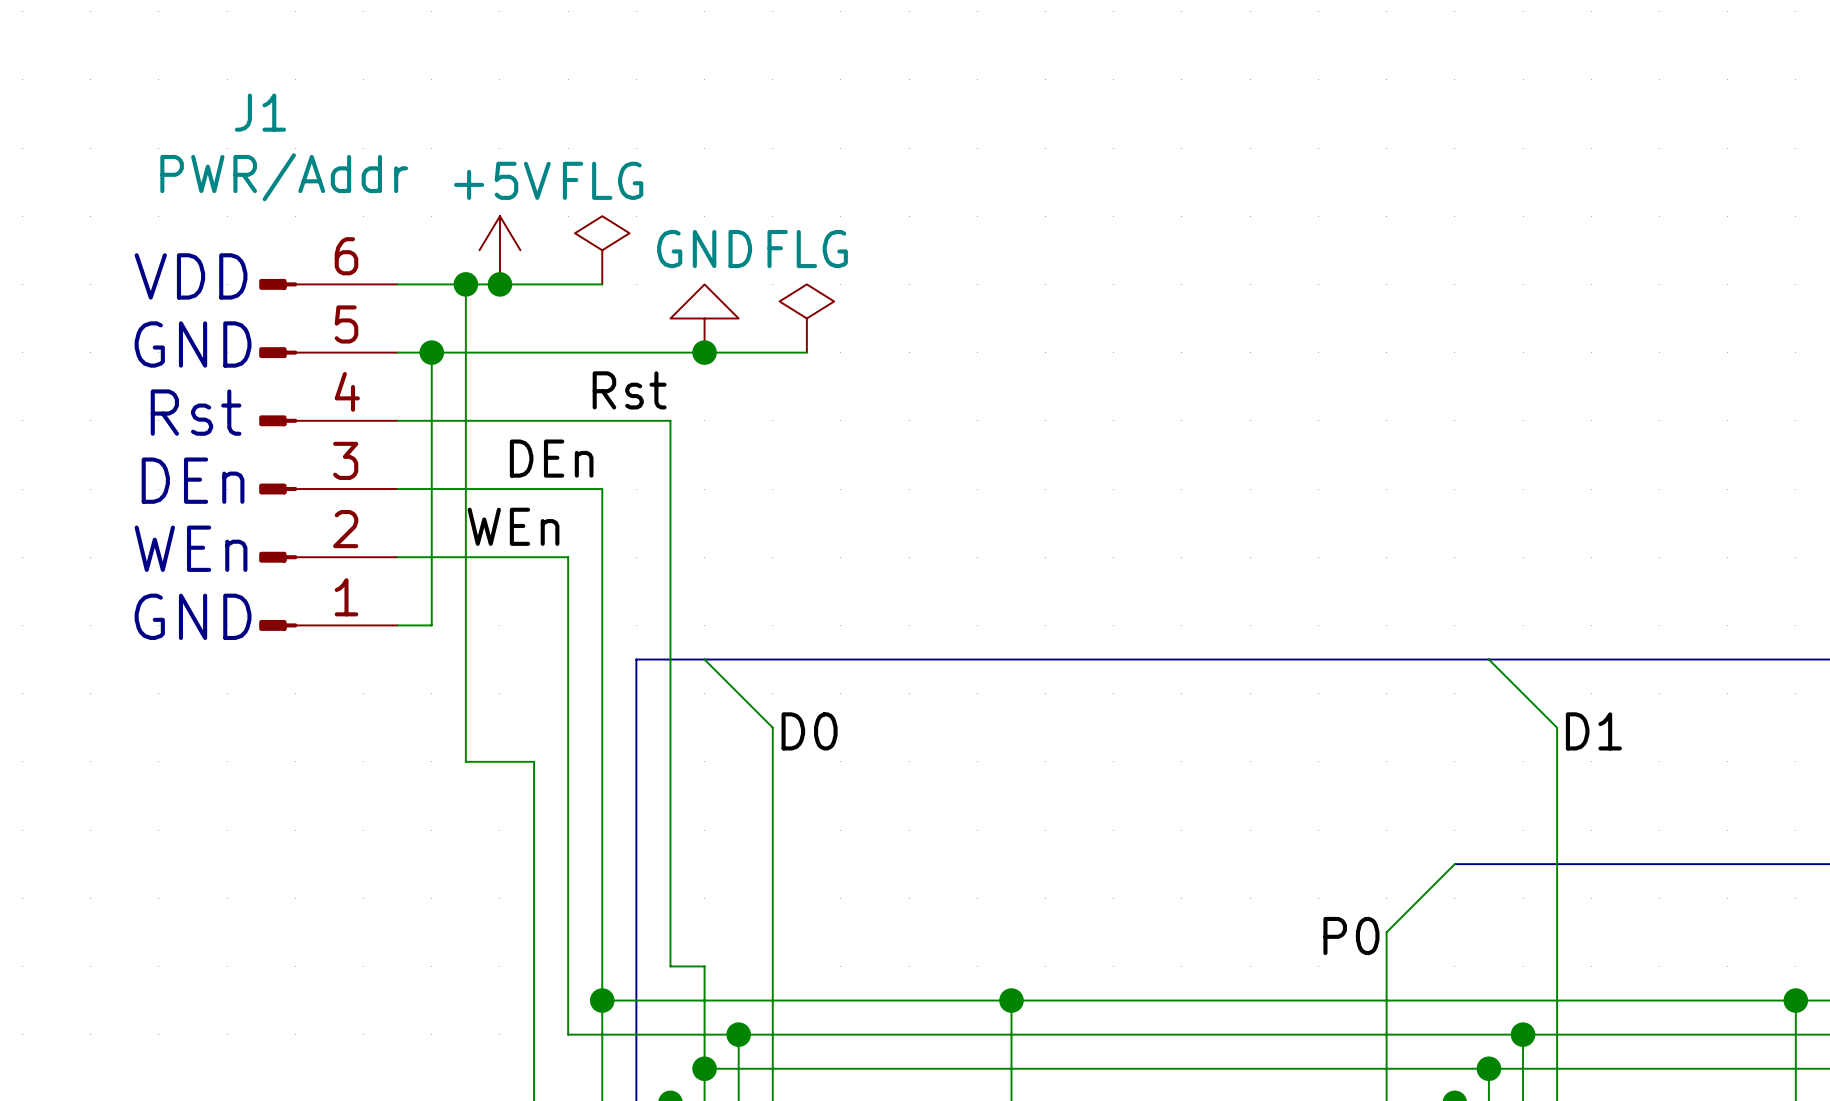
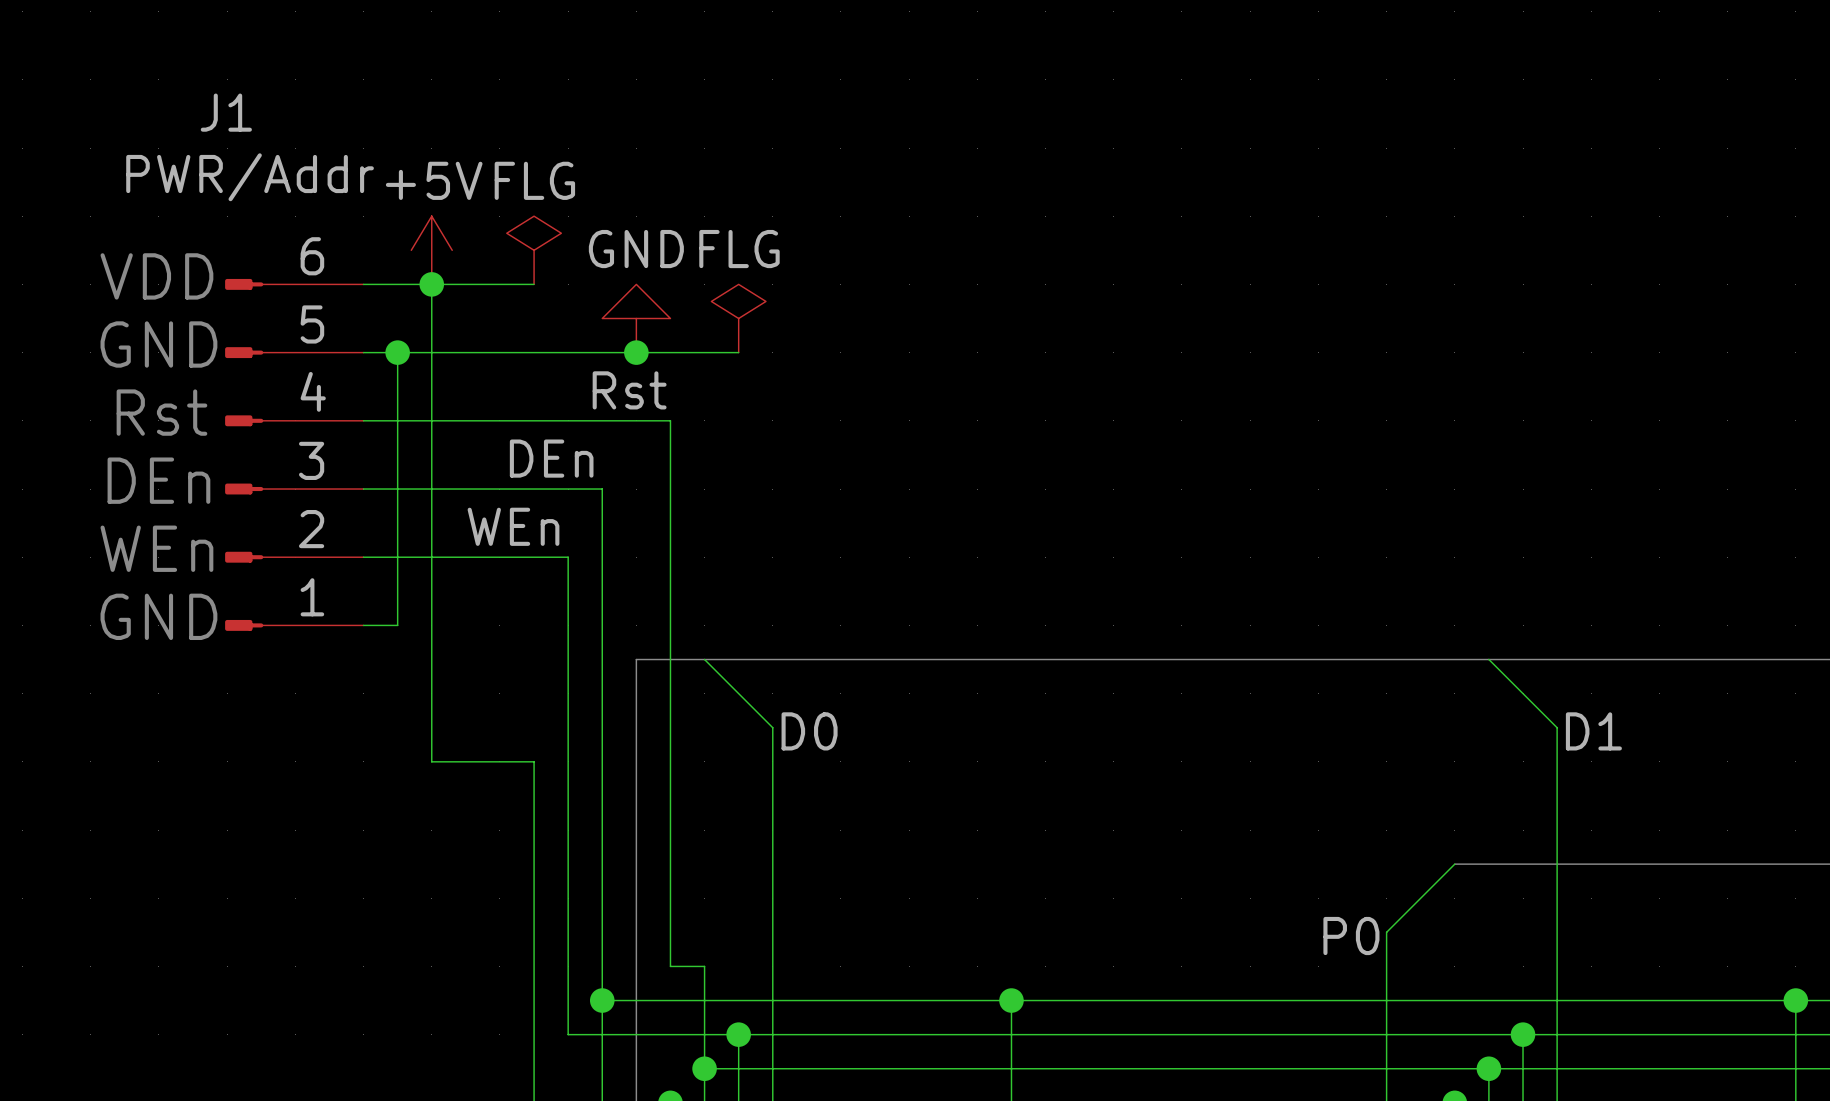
power symbol position: +5V (499, 250) -> +5V (431, 250)
power symbol position: FLG (602, 250) -> FLG (534, 250)
text position: VDD (191, 276) -> VDD (156, 276)
wire: none -> (431, 284) (431, 352)
junction: none -> (431, 284)
wire: (465, 284) (465, 761) -> none
junction: (465, 284) -> none
junction: (499, 284) -> none
wire: (534, 284) (602, 284) -> none
power symbol position: GND (704, 318) -> GND (636, 318)
power symbol position: FLG (806, 318) -> FLG (738, 318)
text position: GND (193, 344) -> GND (158, 344)
wire: none -> (363, 352) (397, 352) (397, 625) (363, 625)
junction: none -> (397, 352)
junction: (431, 352) -> none
junction position: (704, 352) -> (636, 352)
wire: (738, 352) (806, 352) -> none
text position: Rst (196, 412) -> Rst (161, 412)
J1 position: (328, 454) -> (294, 454)
text position: DEn (193, 480) -> DEn (158, 480)
text position: WEn (191, 548) -> WEn (156, 548)
text position: GND (193, 616) -> GND (158, 616)
wire: (397, 625) (431, 625) -> (465, 761) (431, 761) (431, 625)

